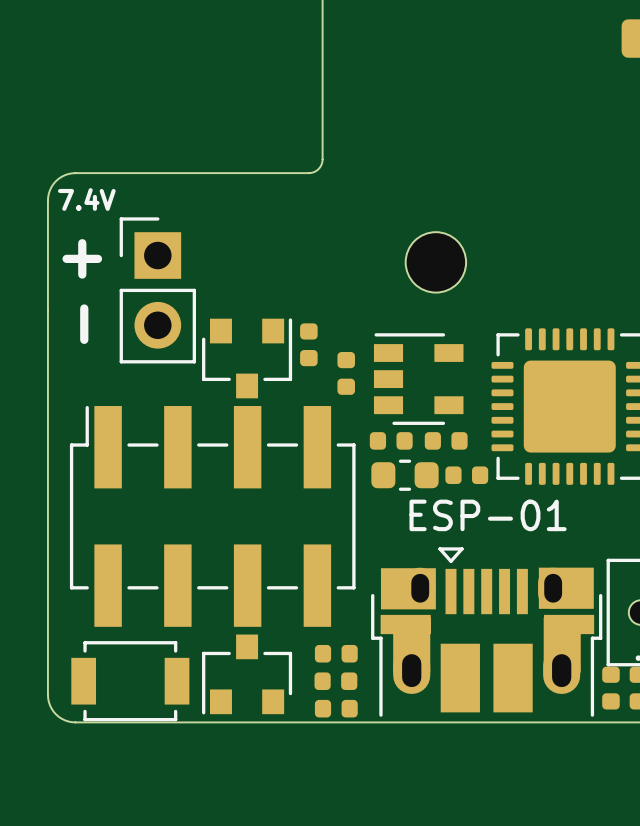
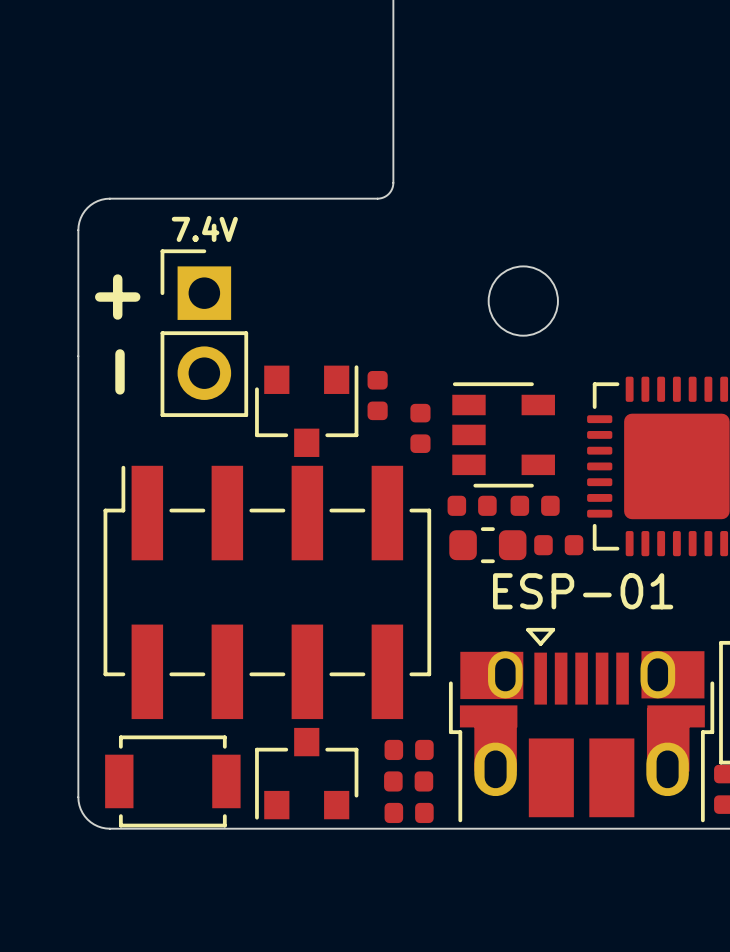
text position: 7.4V (86, 199) -> 7.4V (204, 228)

